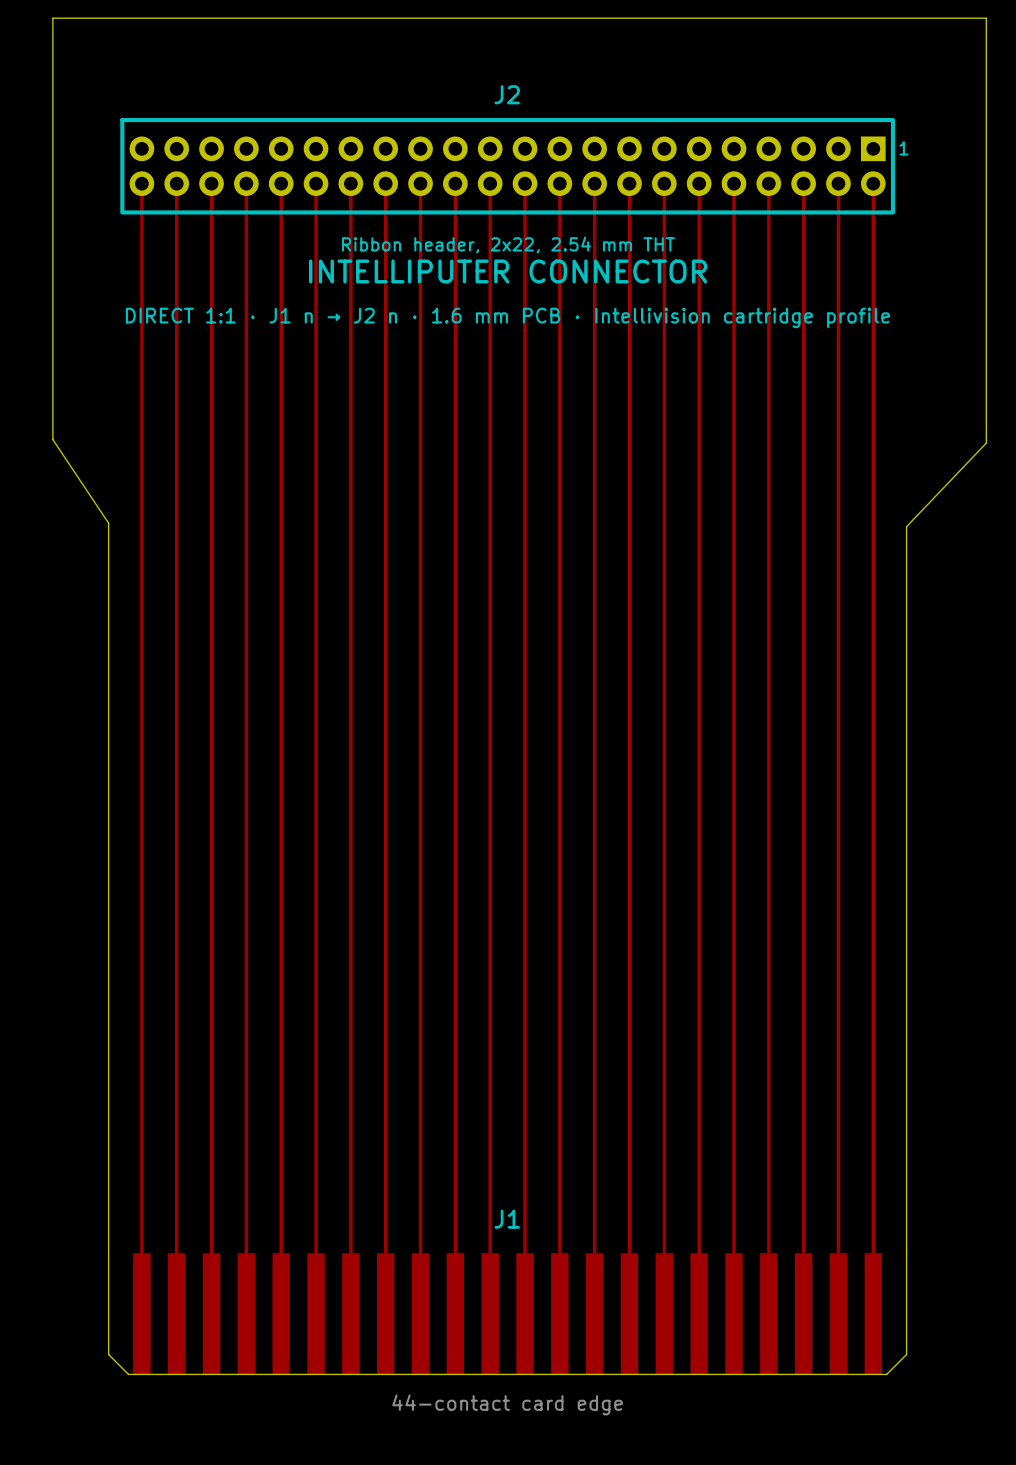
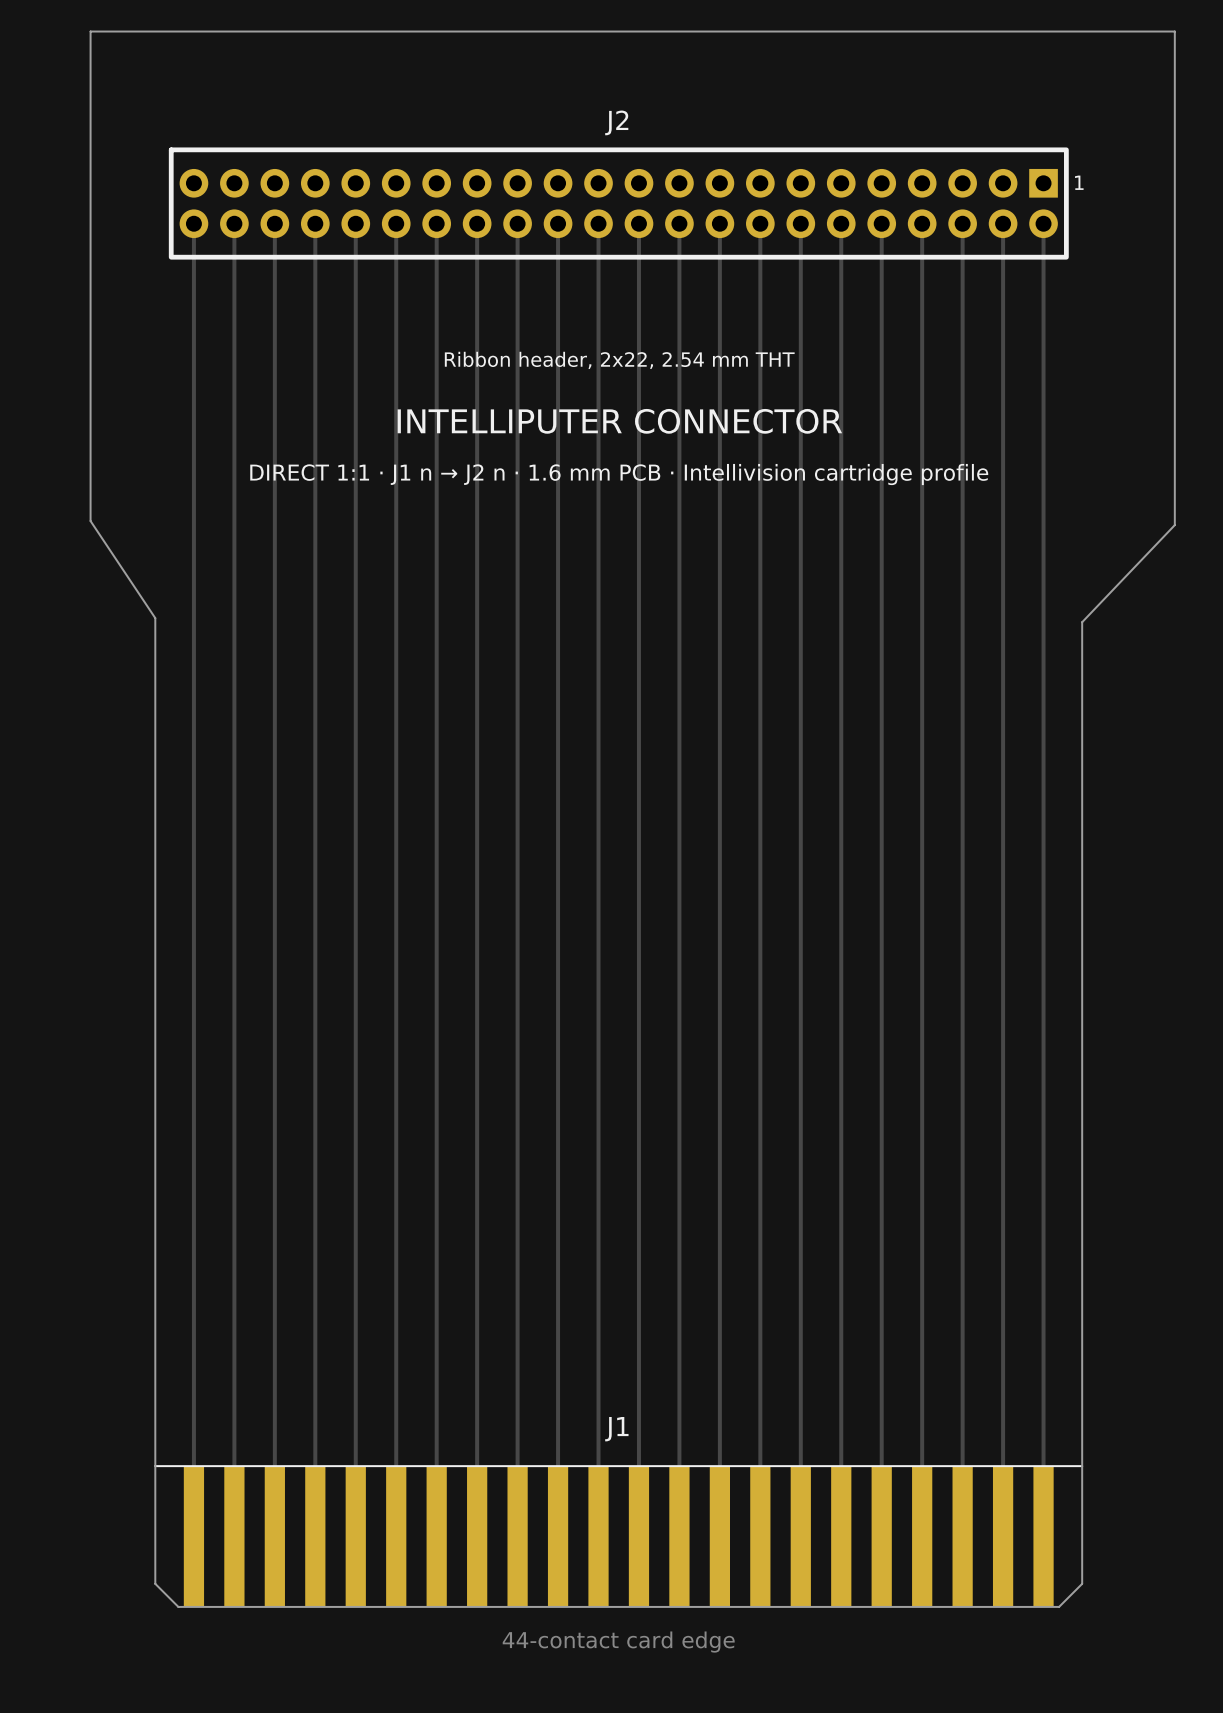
J2 value position: Ribbon header, 2x22, 2.54 mm THT (508, 244) -> Ribbon header, 2x22, 2.54 mm THT (619, 360)
text position: INTELLIPUTER CONNECTOR (508, 271) -> INTELLIPUTER CONNECTOR (619, 421)
text position: DIRECT 1:1 · J1 n → J2 n · 1.6 mm PCB · Intellivision cartridge profile (507, 317) -> DIRECT 1:1 · J1 n → J2 n · 1.6 mm PCB · Intellivision cartridge profile (619, 474)
J1 footprint: [133, 1253, 883, 1375] -> [154, 1465, 1084, 1607]

